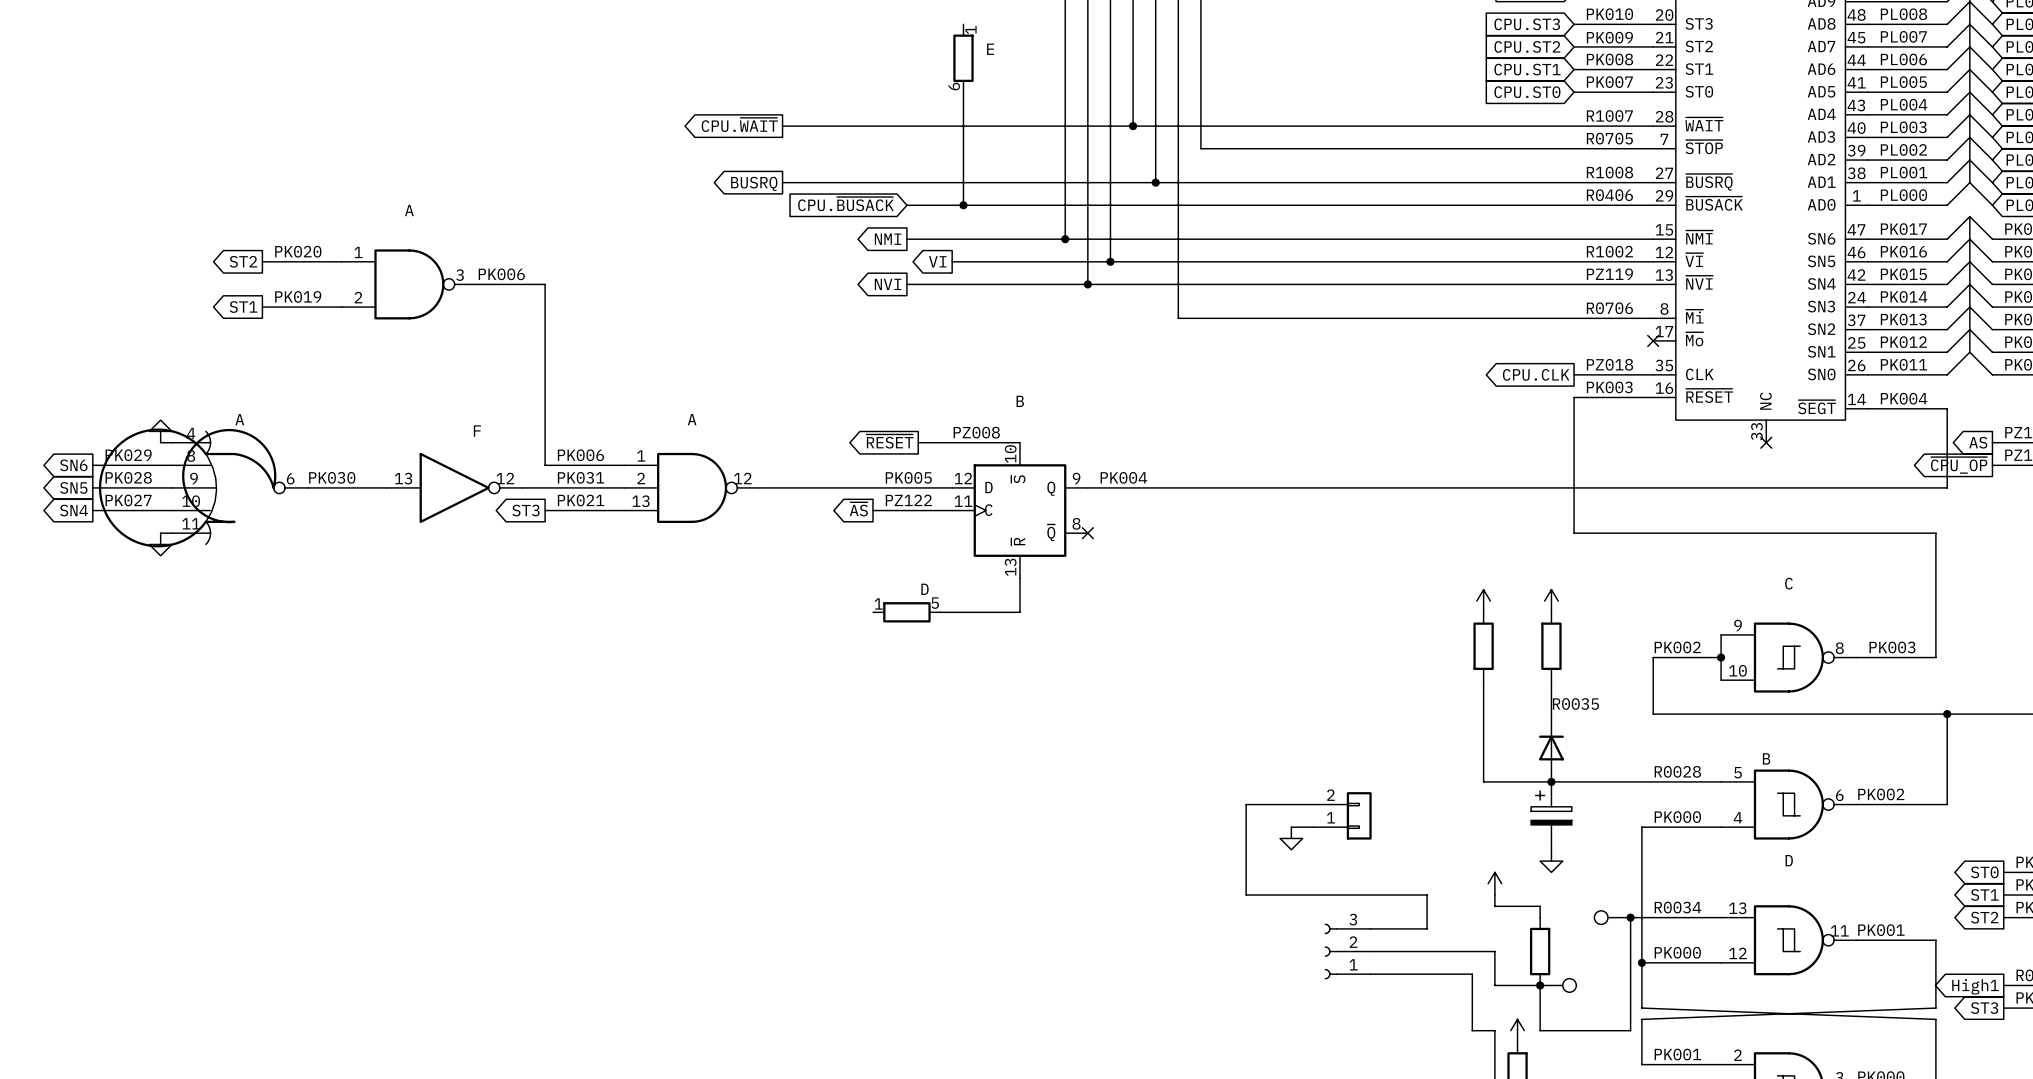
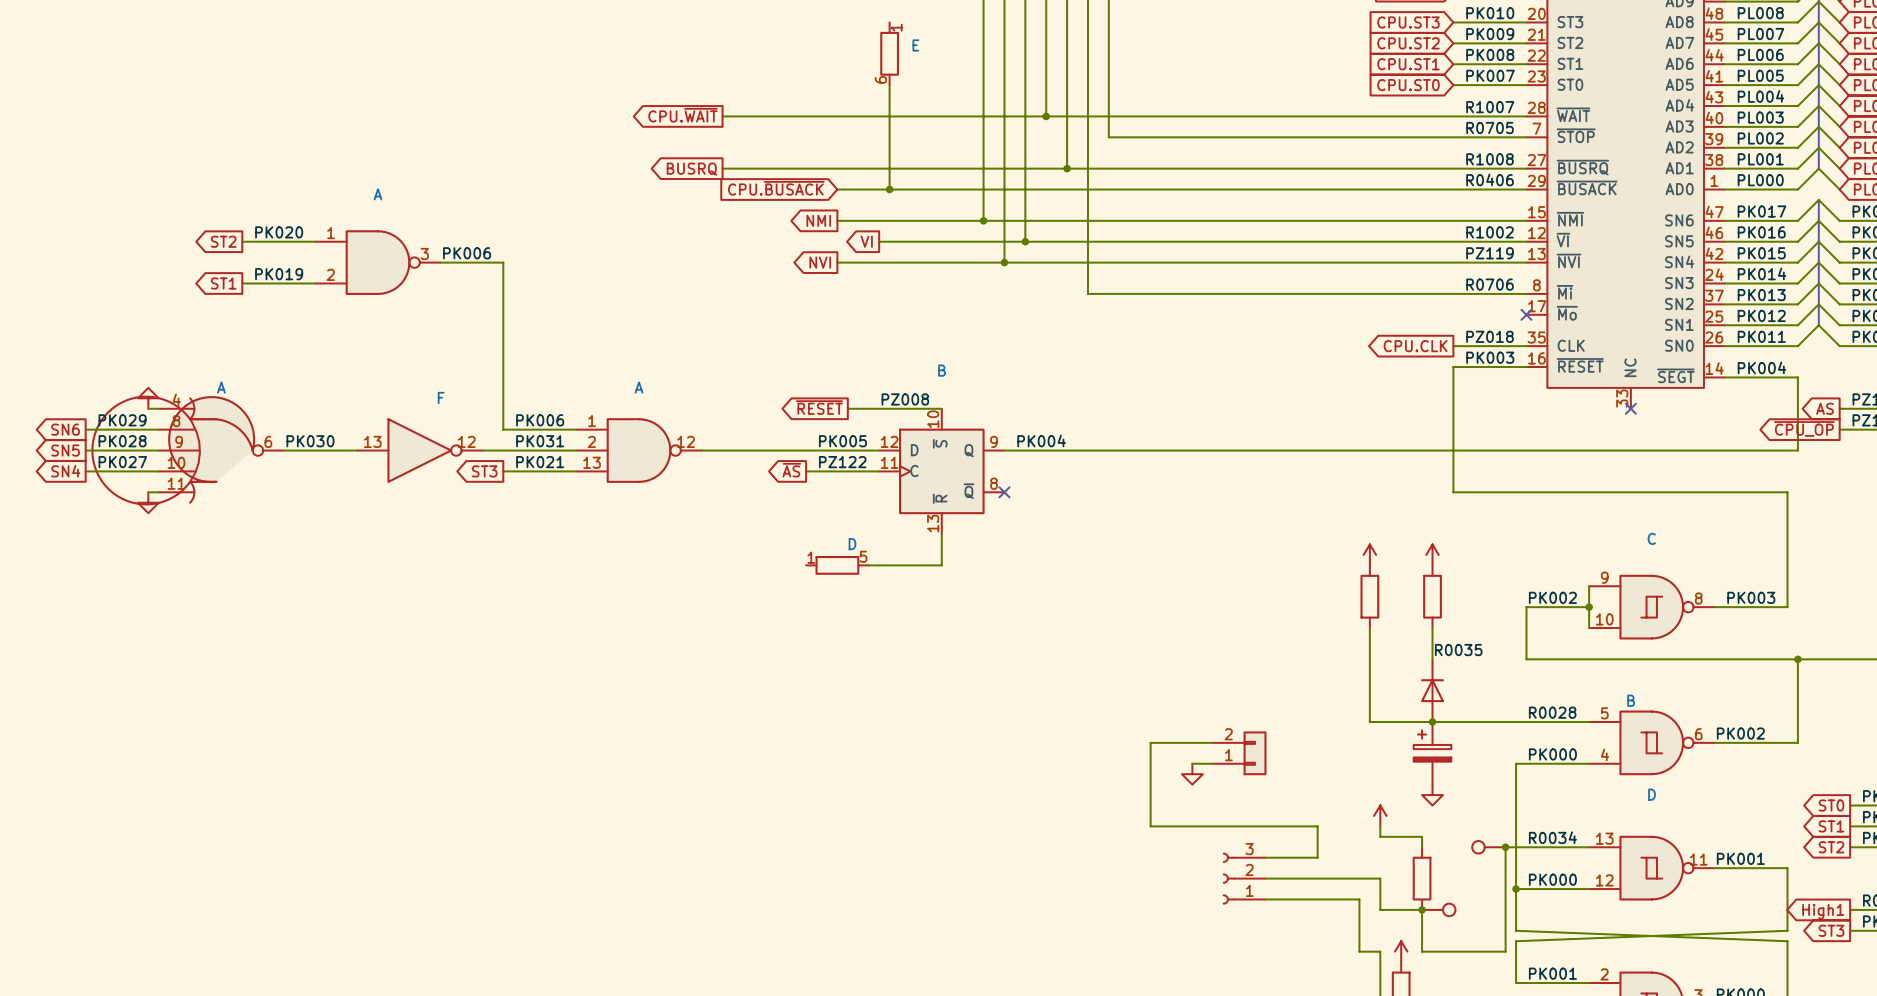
label: none -> PK009 (1490, 34)
text: PK009 (1609, 37) -> none

